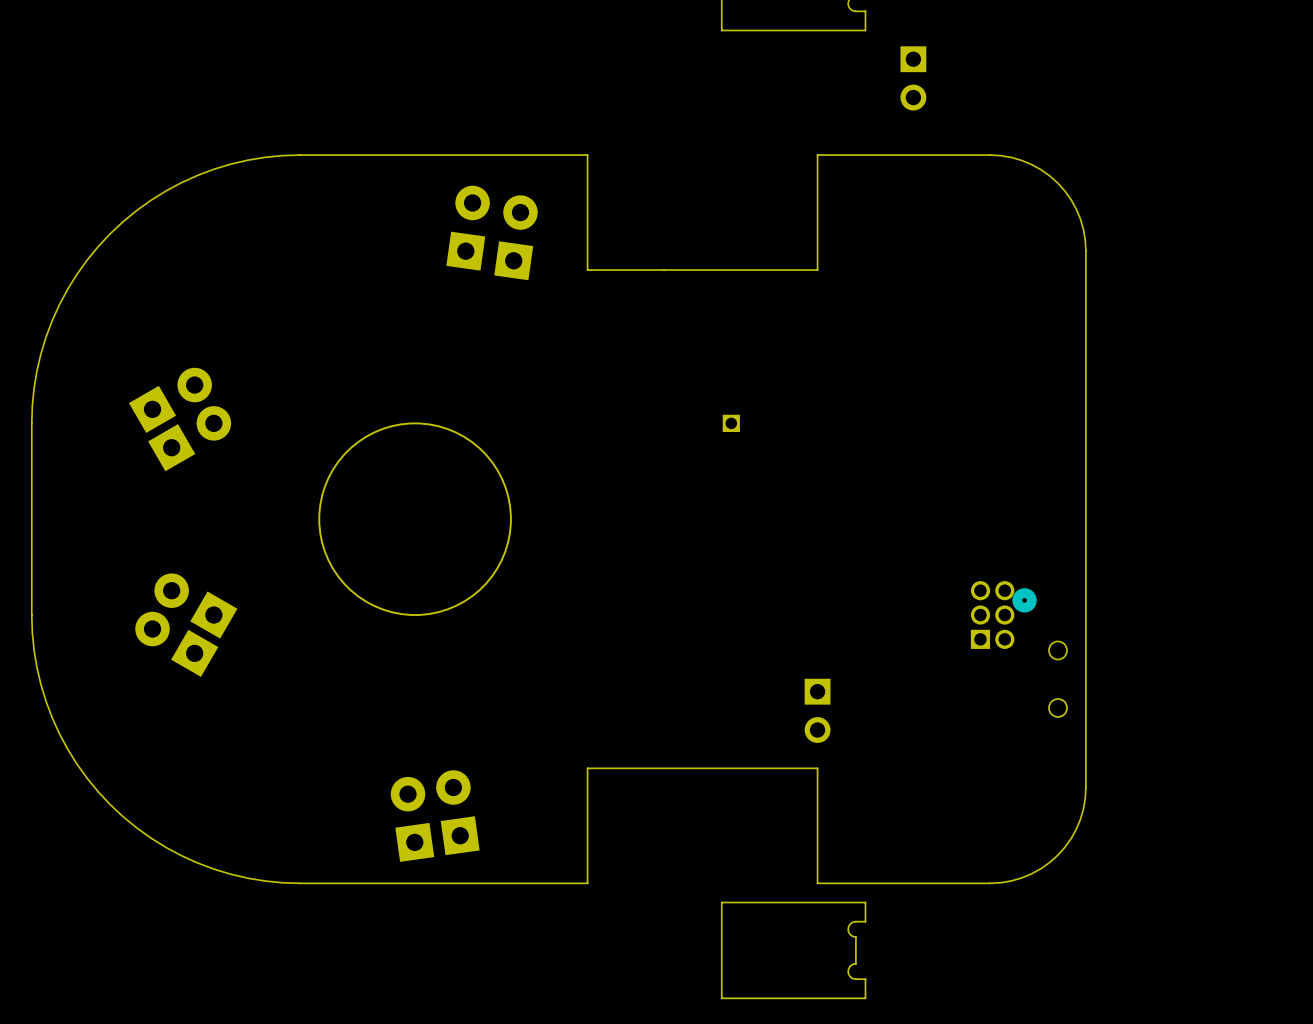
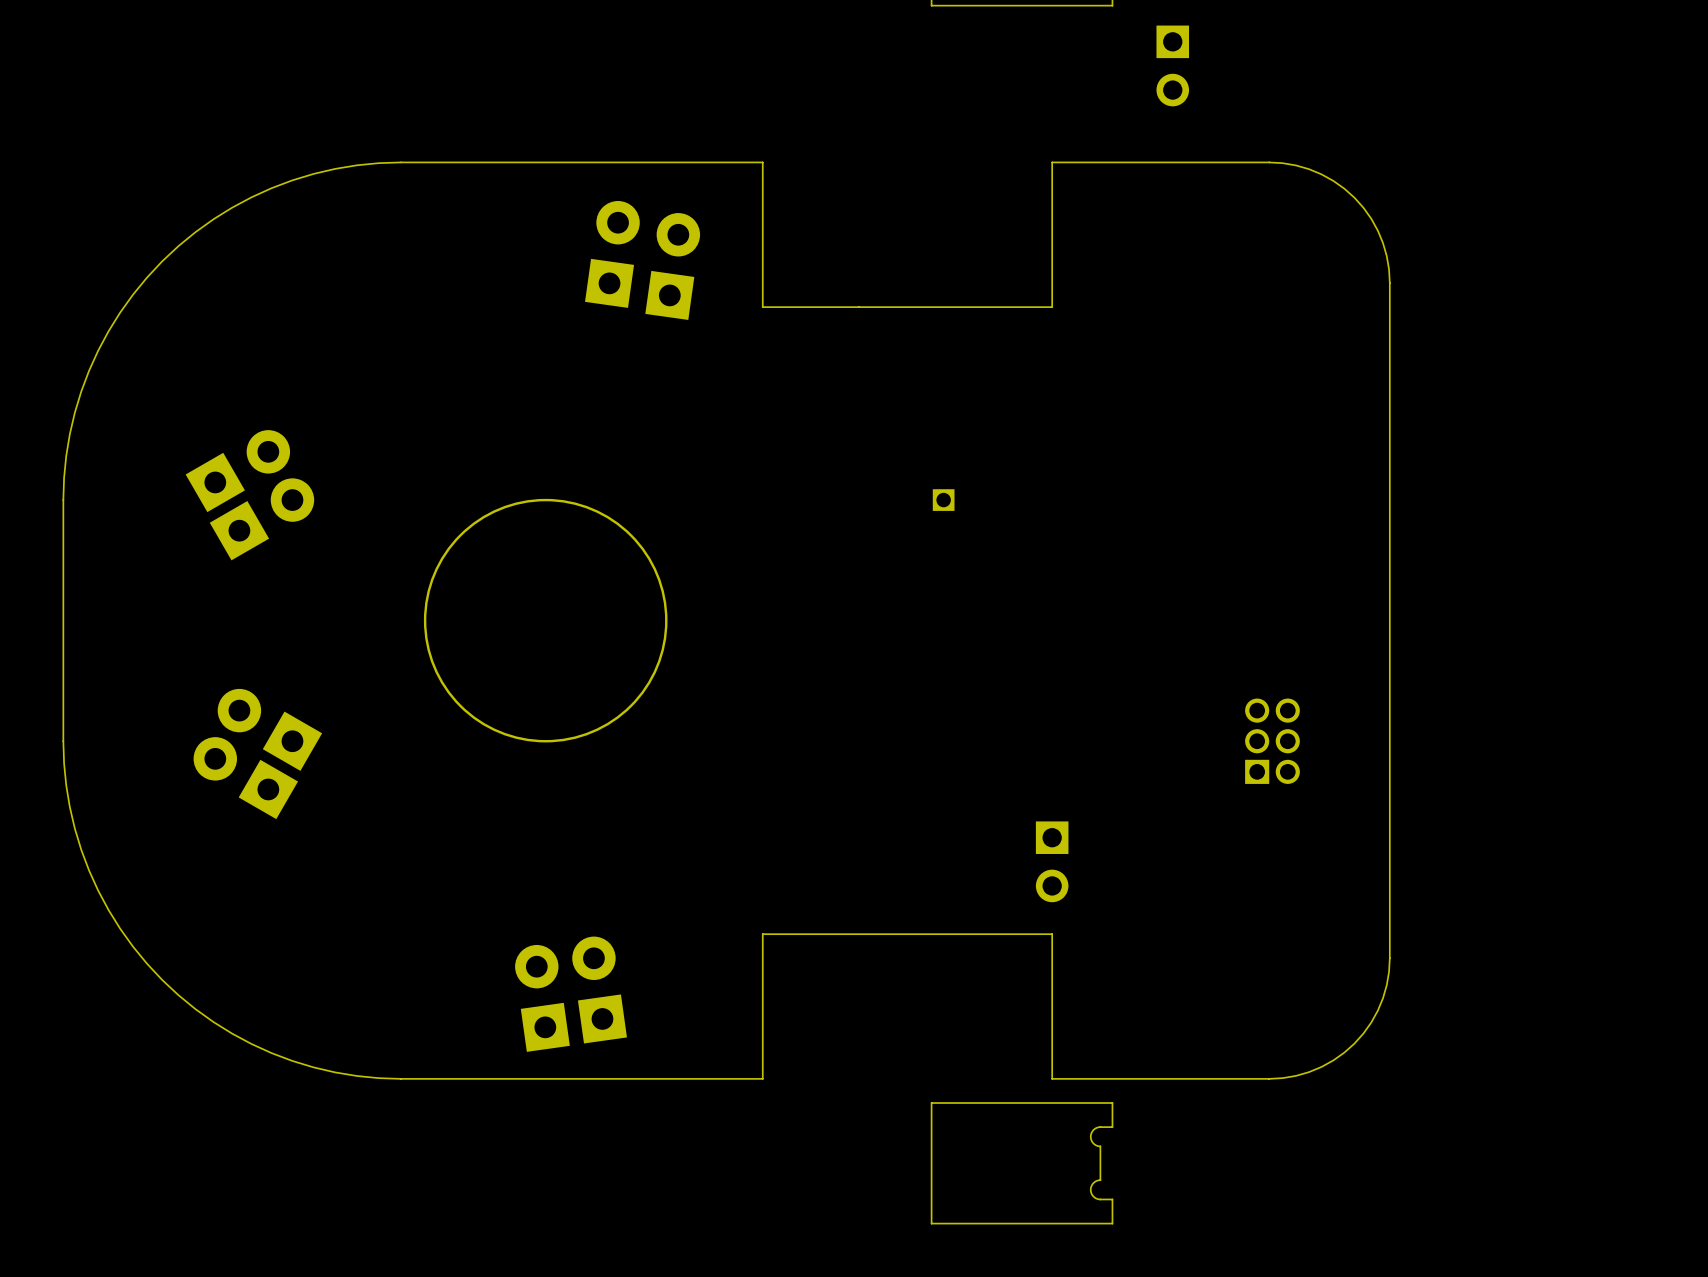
part: (1039, 652) -> none

